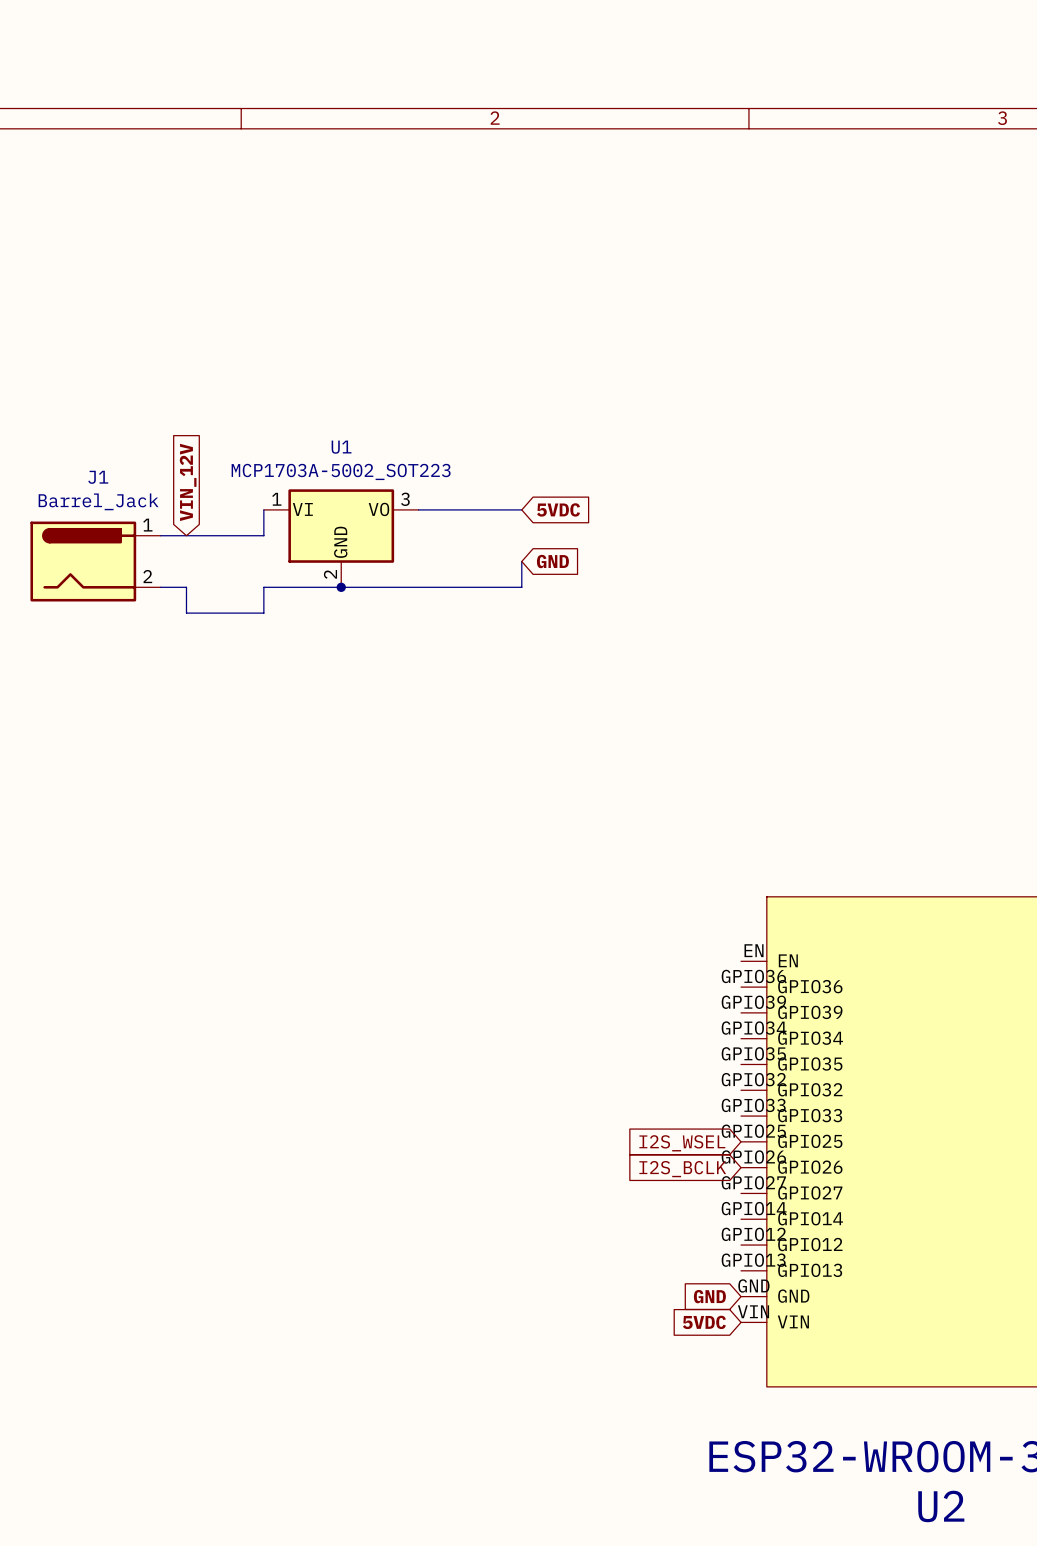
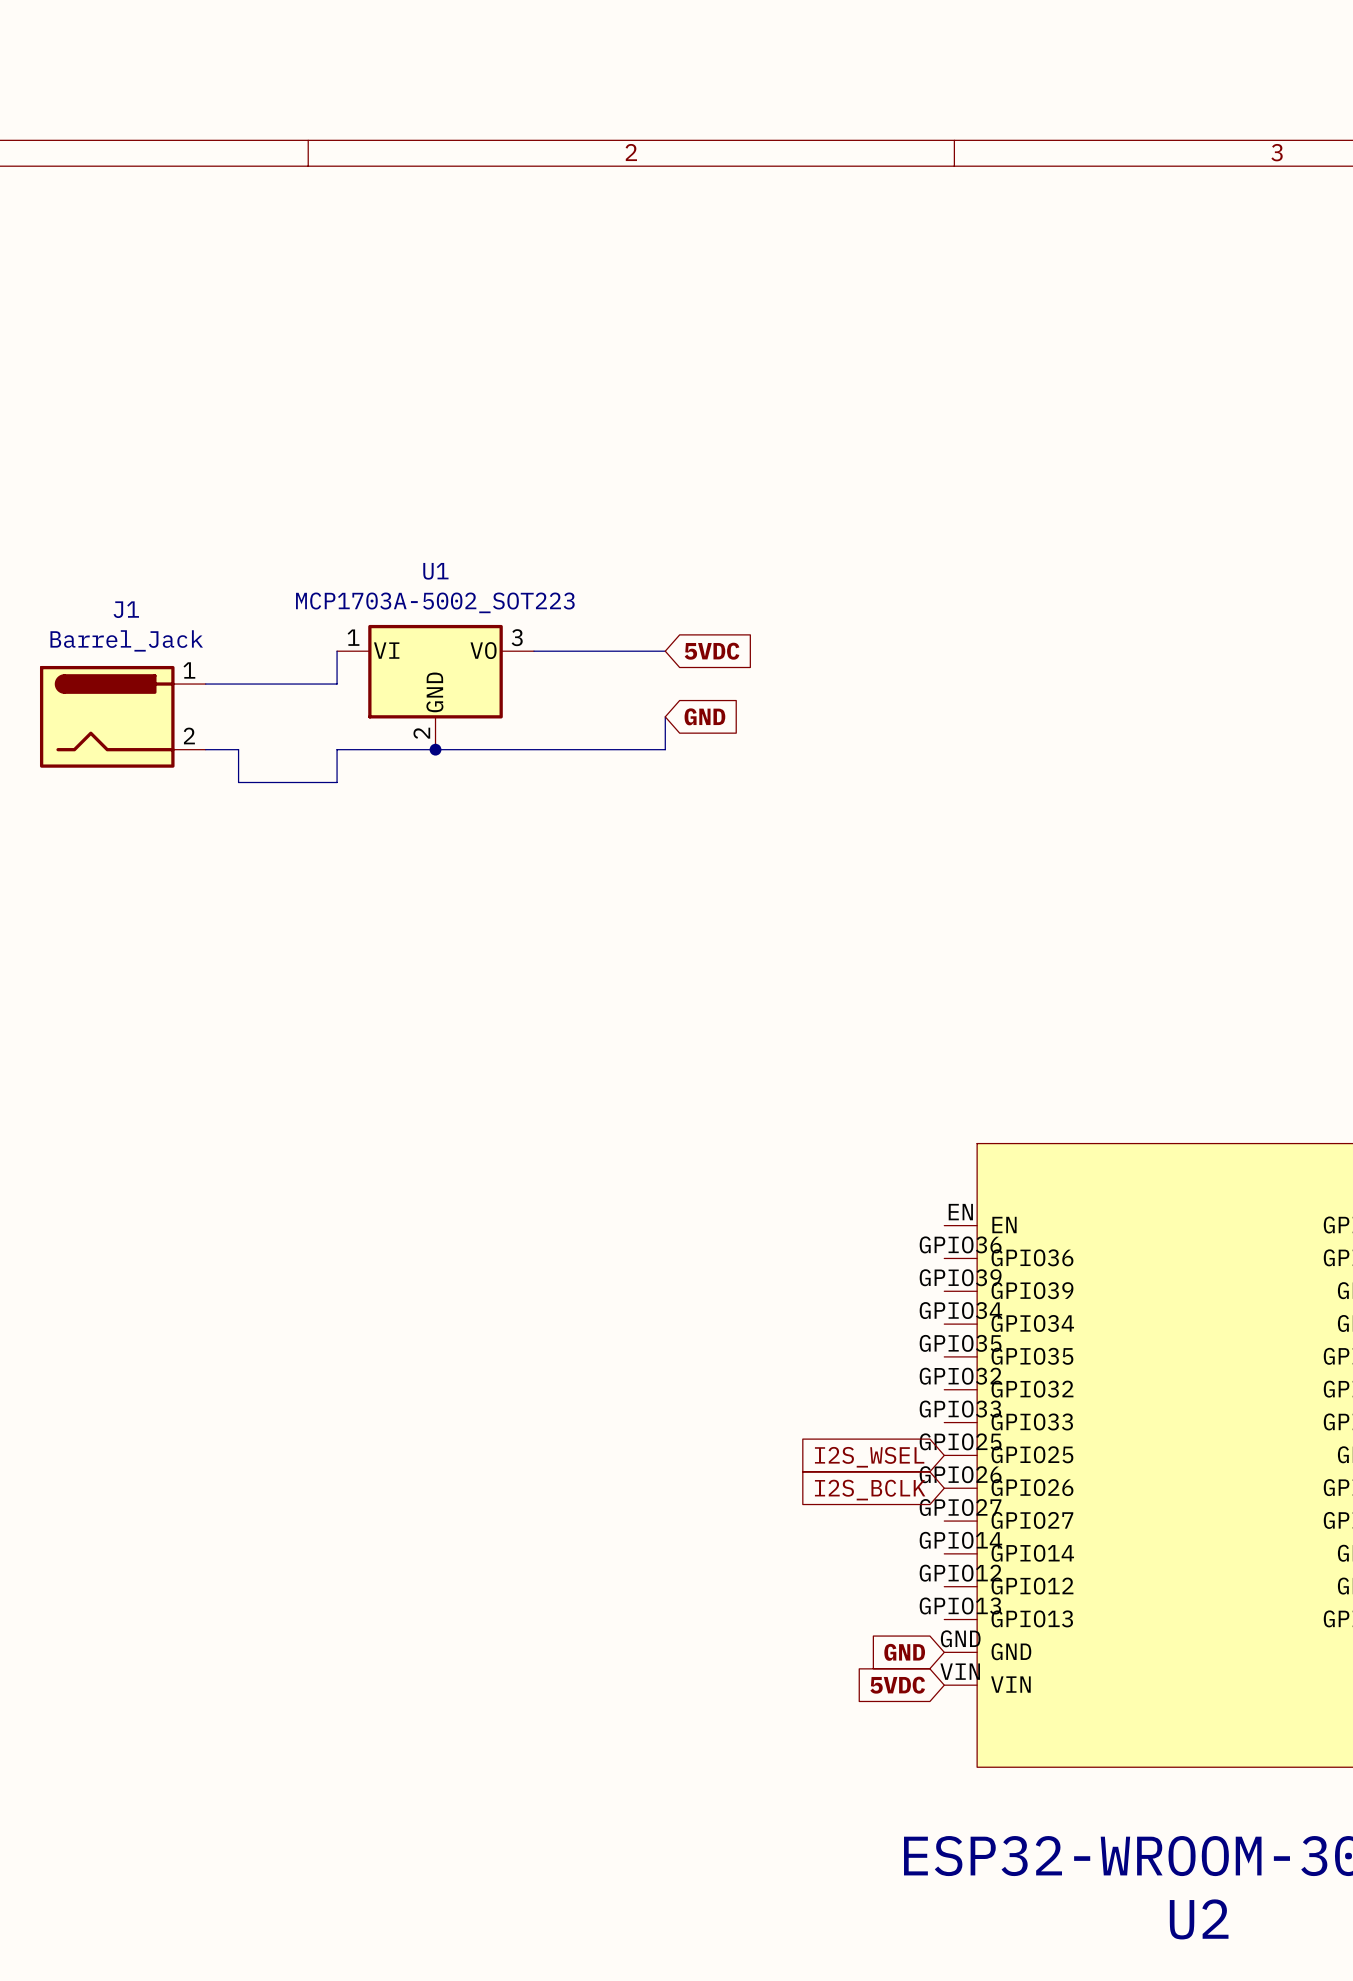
global label: VIN_12V (188, 482) -> none

